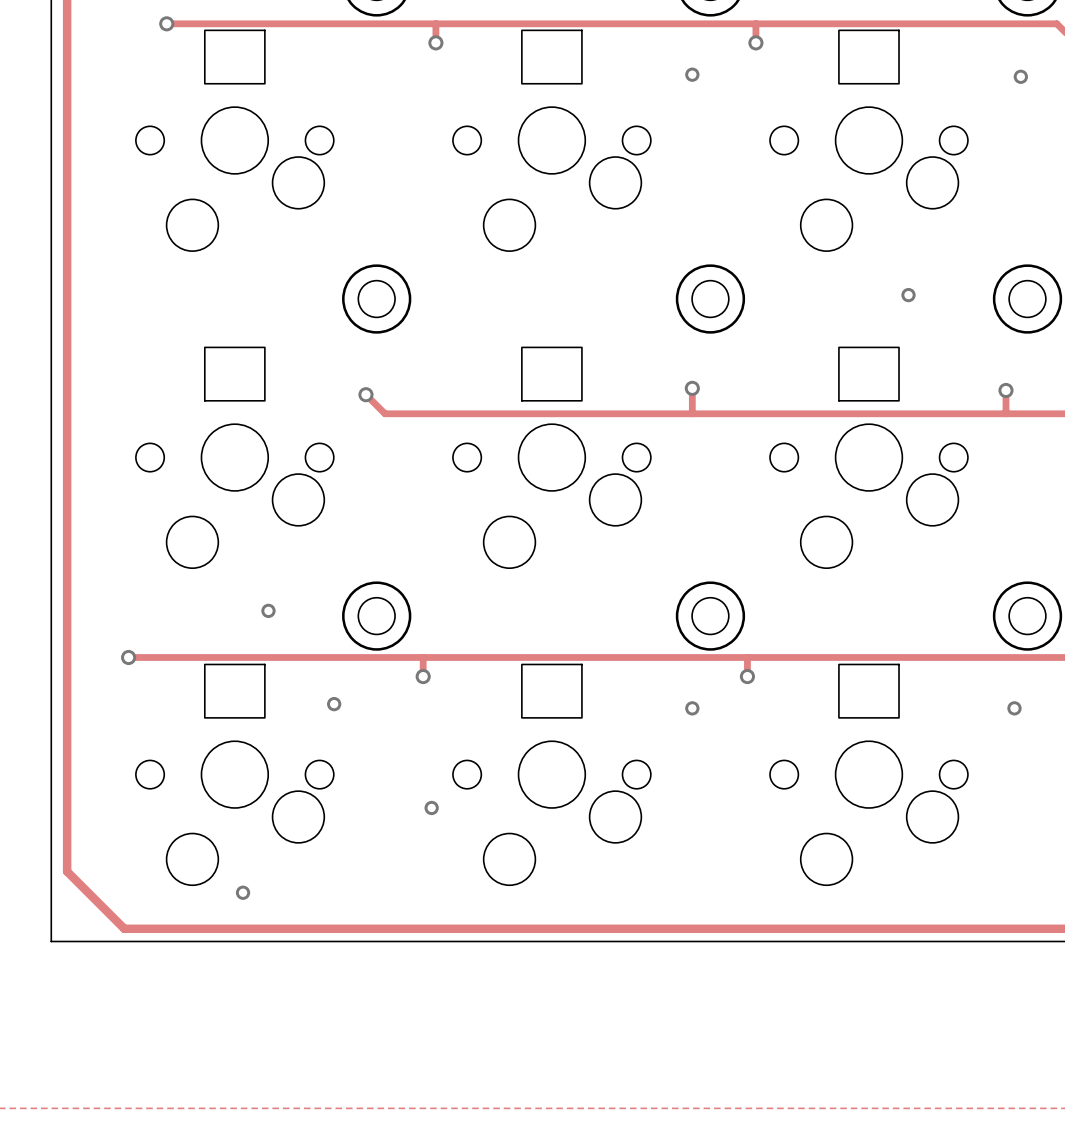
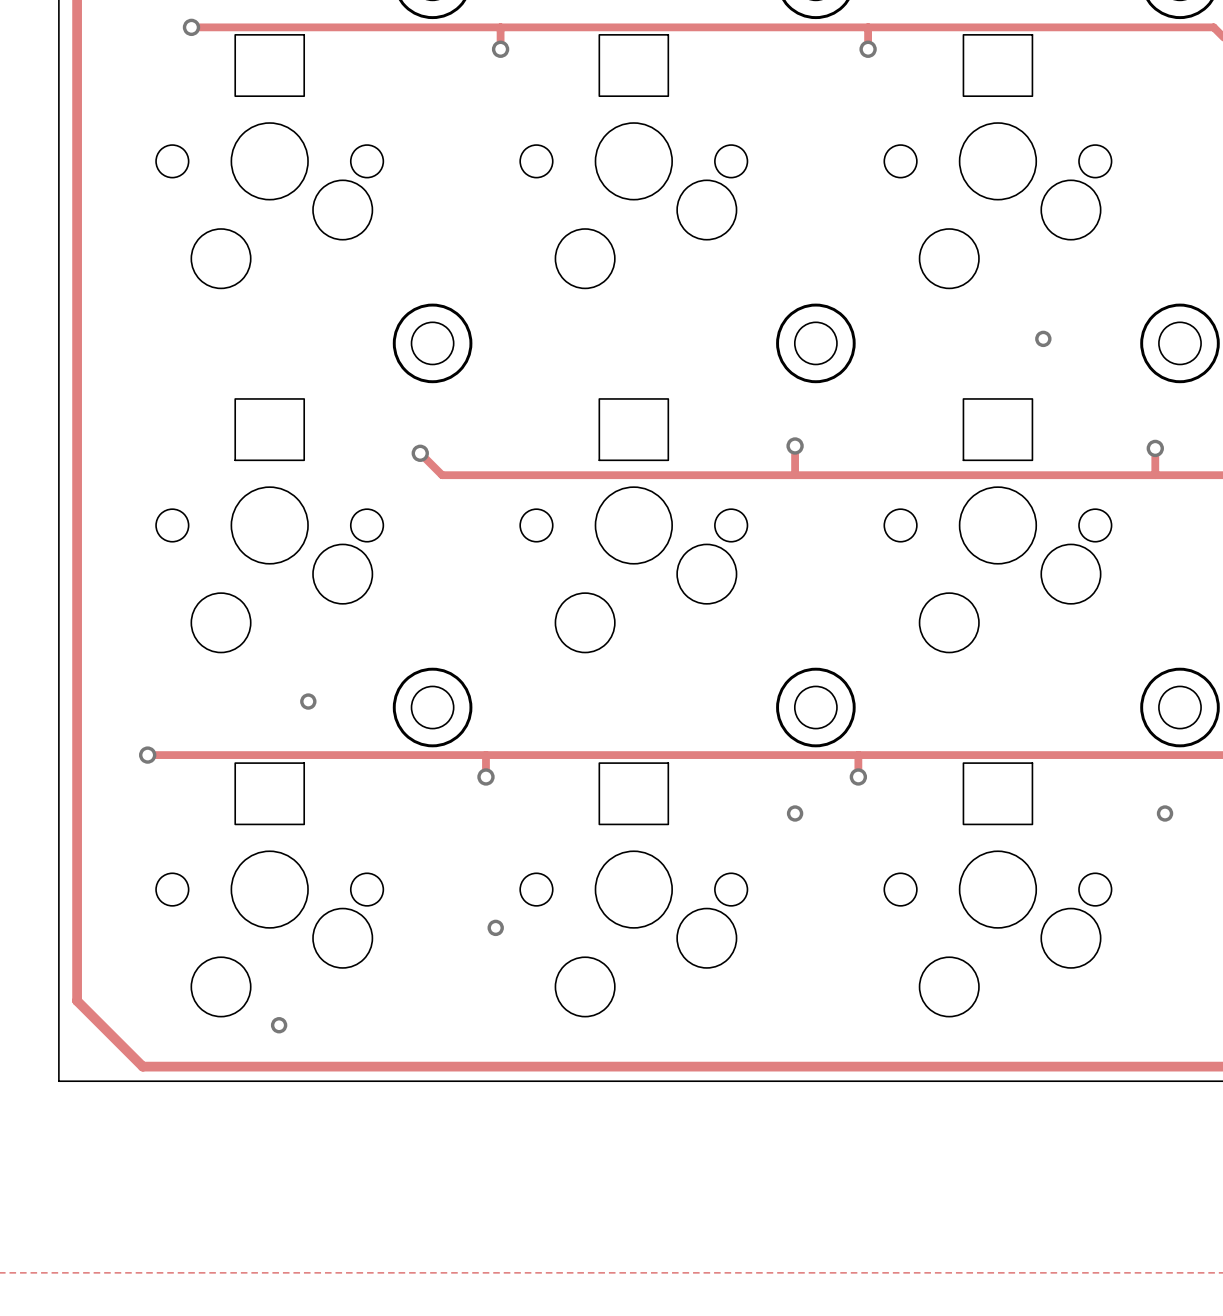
via: (692, 74) -> none
via: (1020, 76) -> none
via: (334, 704) -> none

